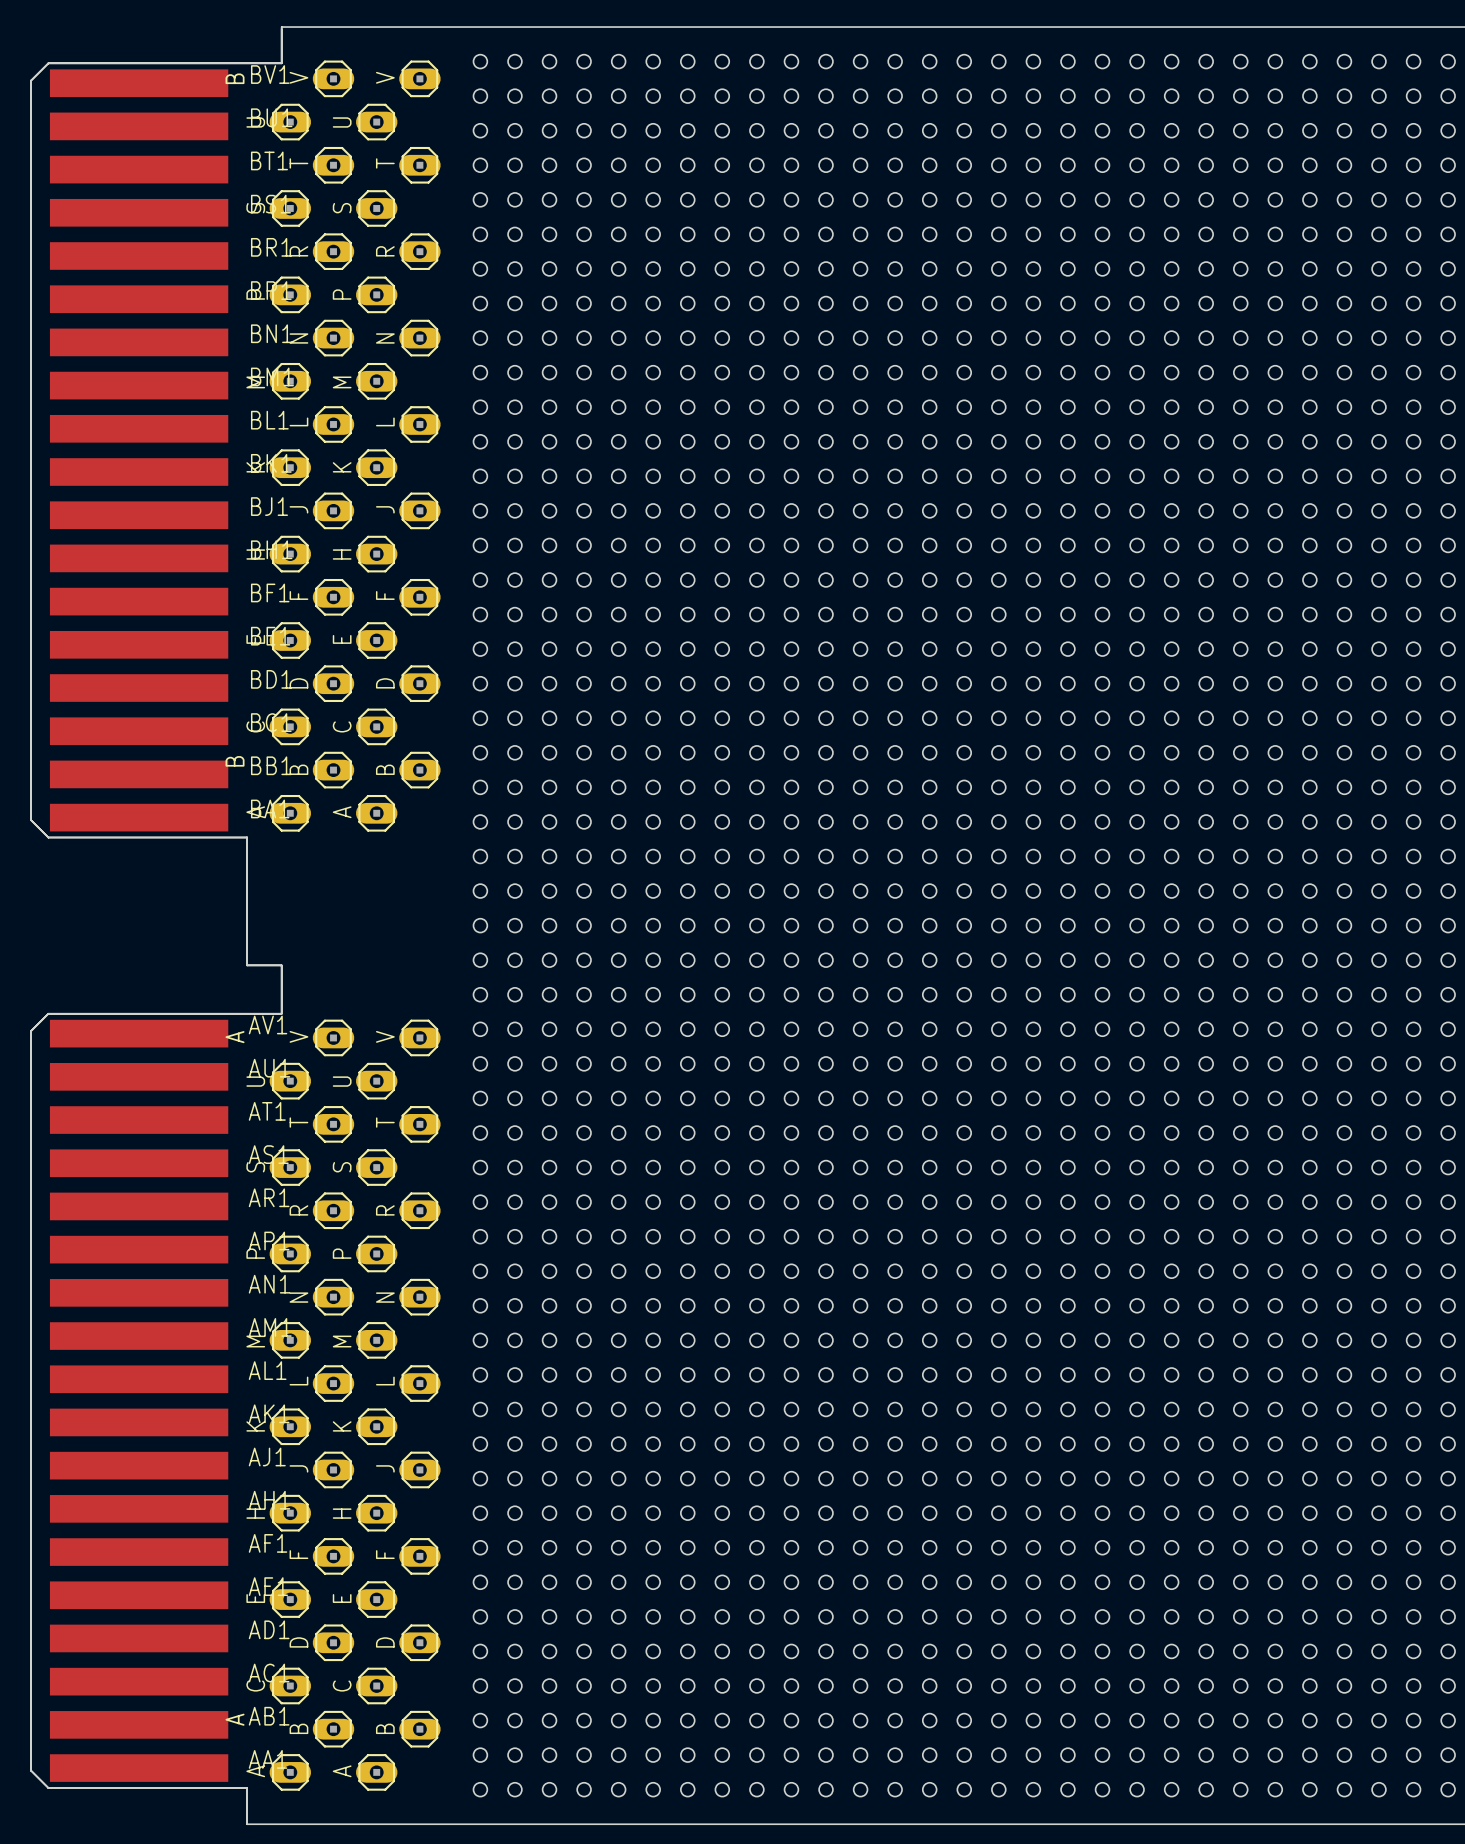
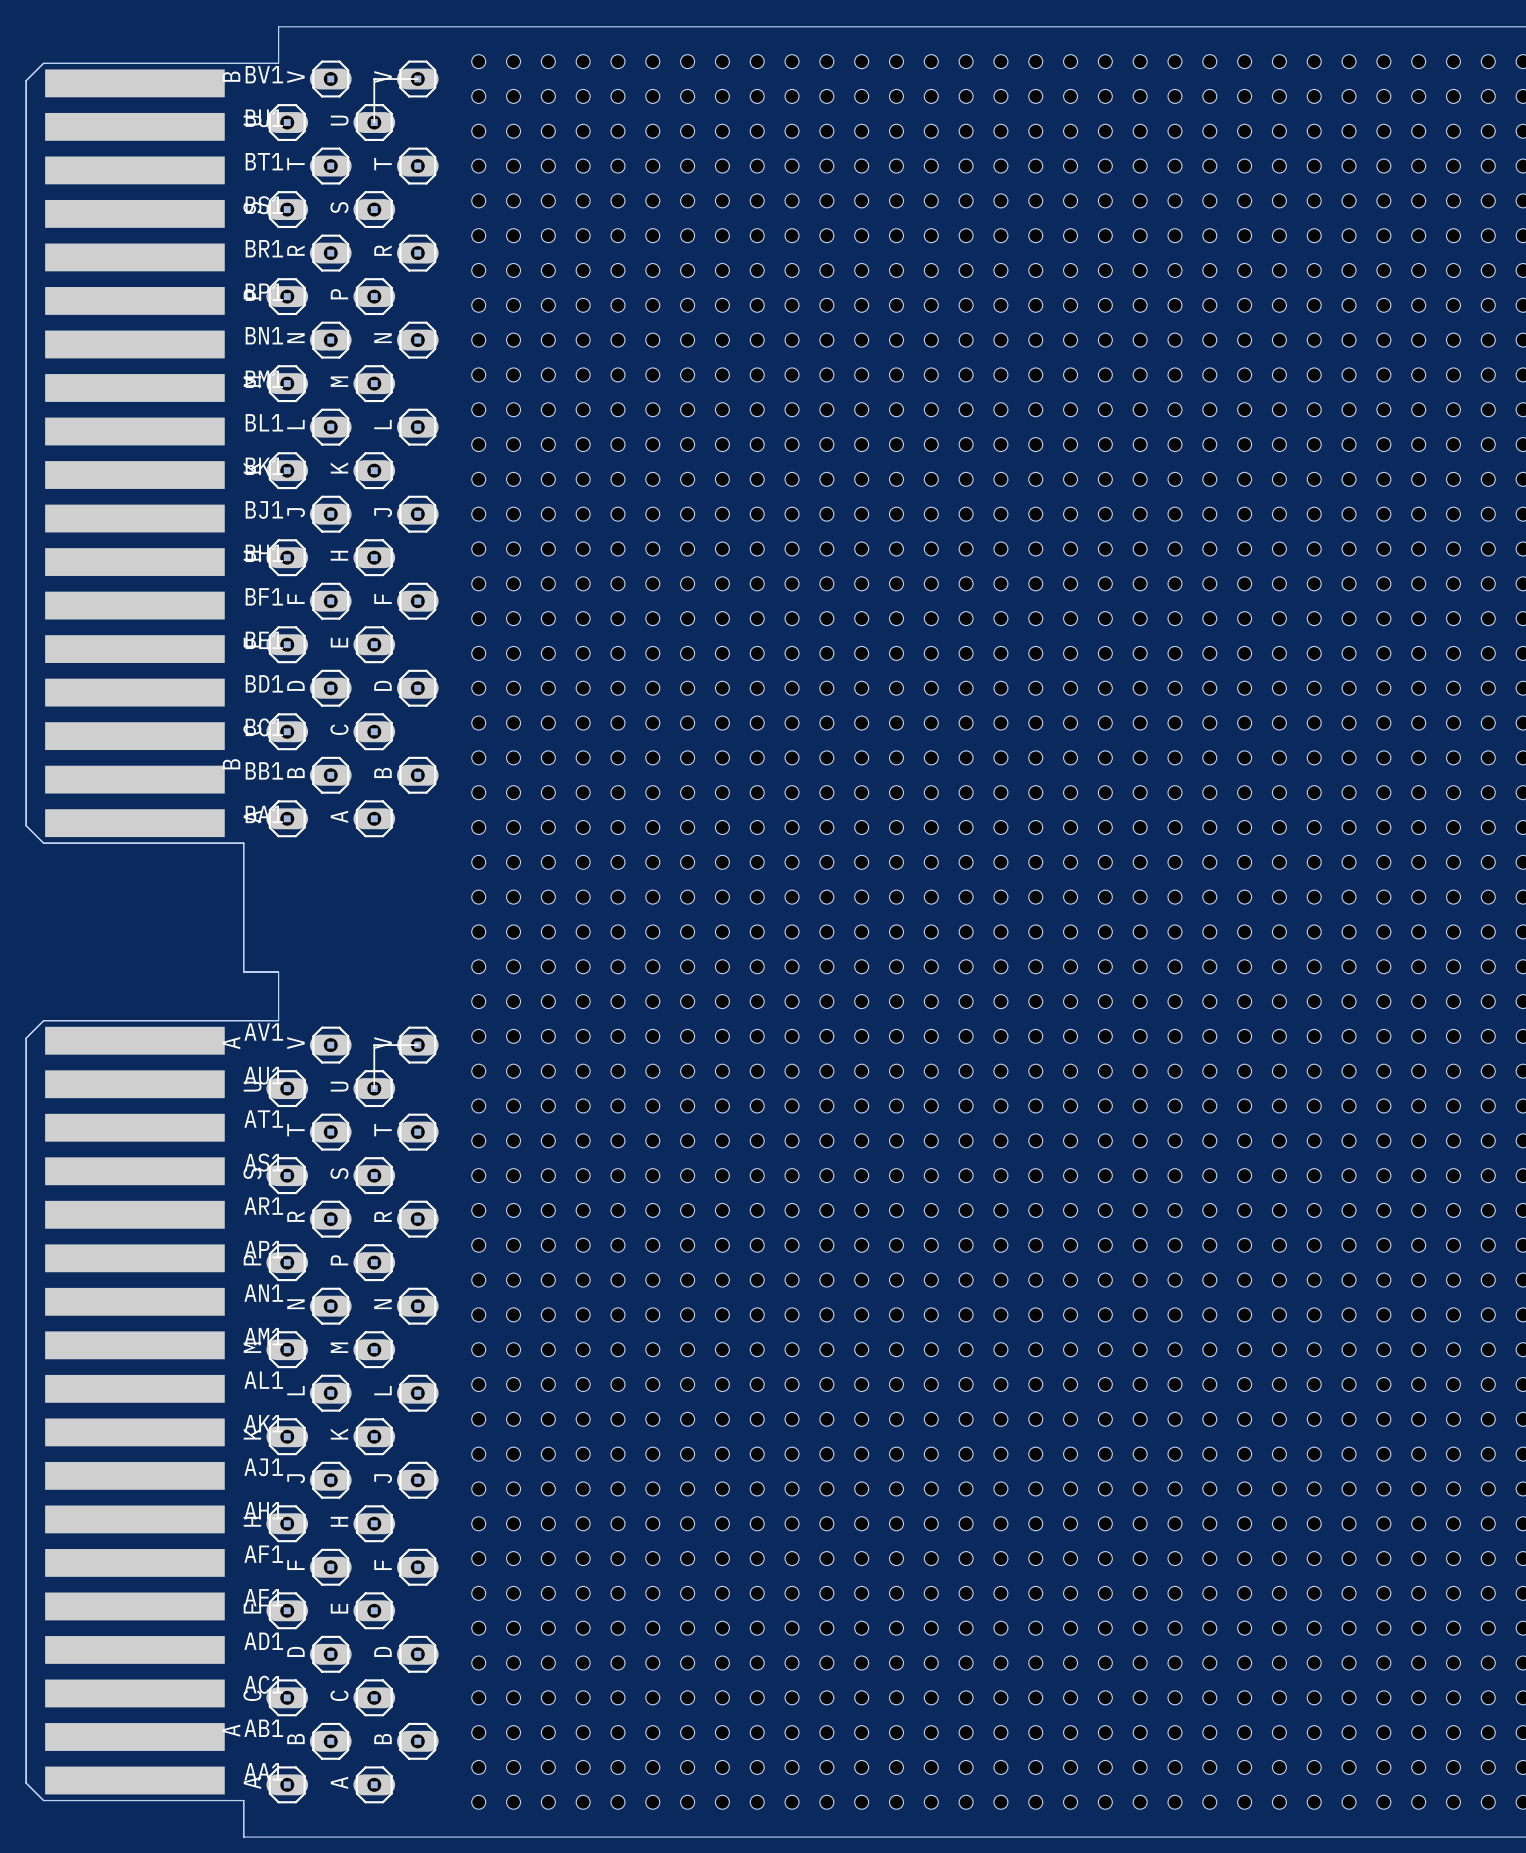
B footprint: [269, 60, 441, 832] -> [266, 60, 439, 838]
A footprint: [269, 1019, 441, 1791] -> [266, 1026, 439, 1804]

